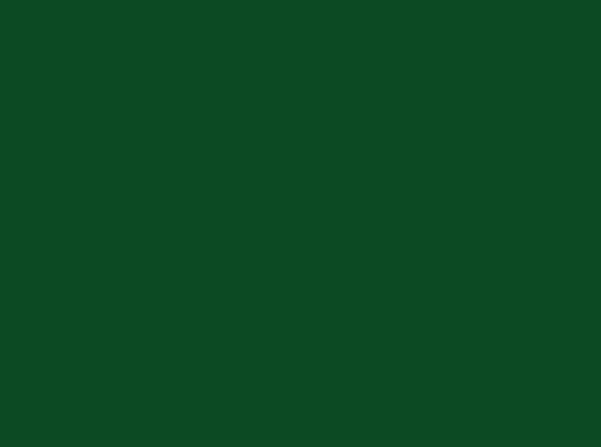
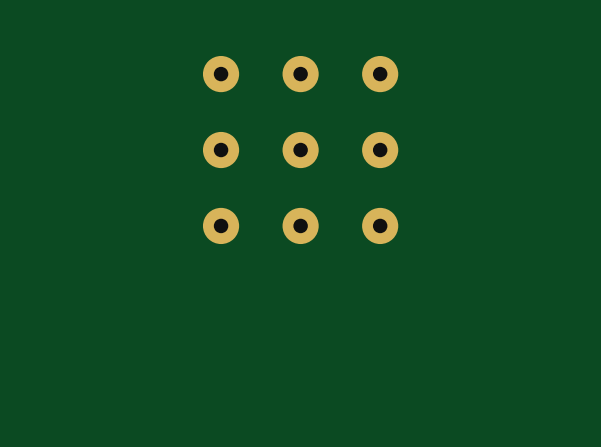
part: none -> (300, 150)

